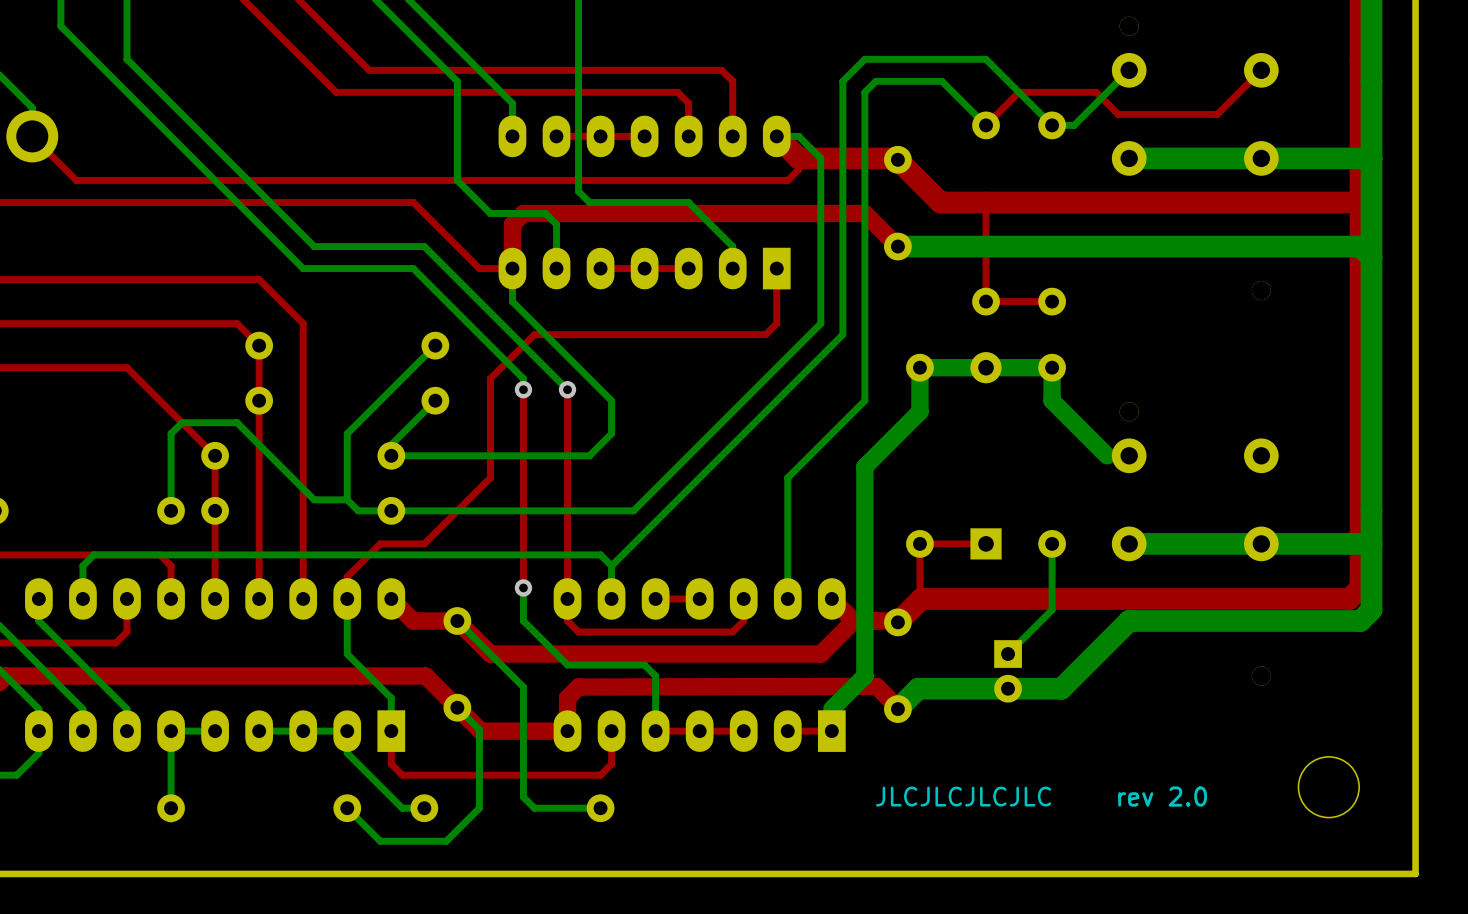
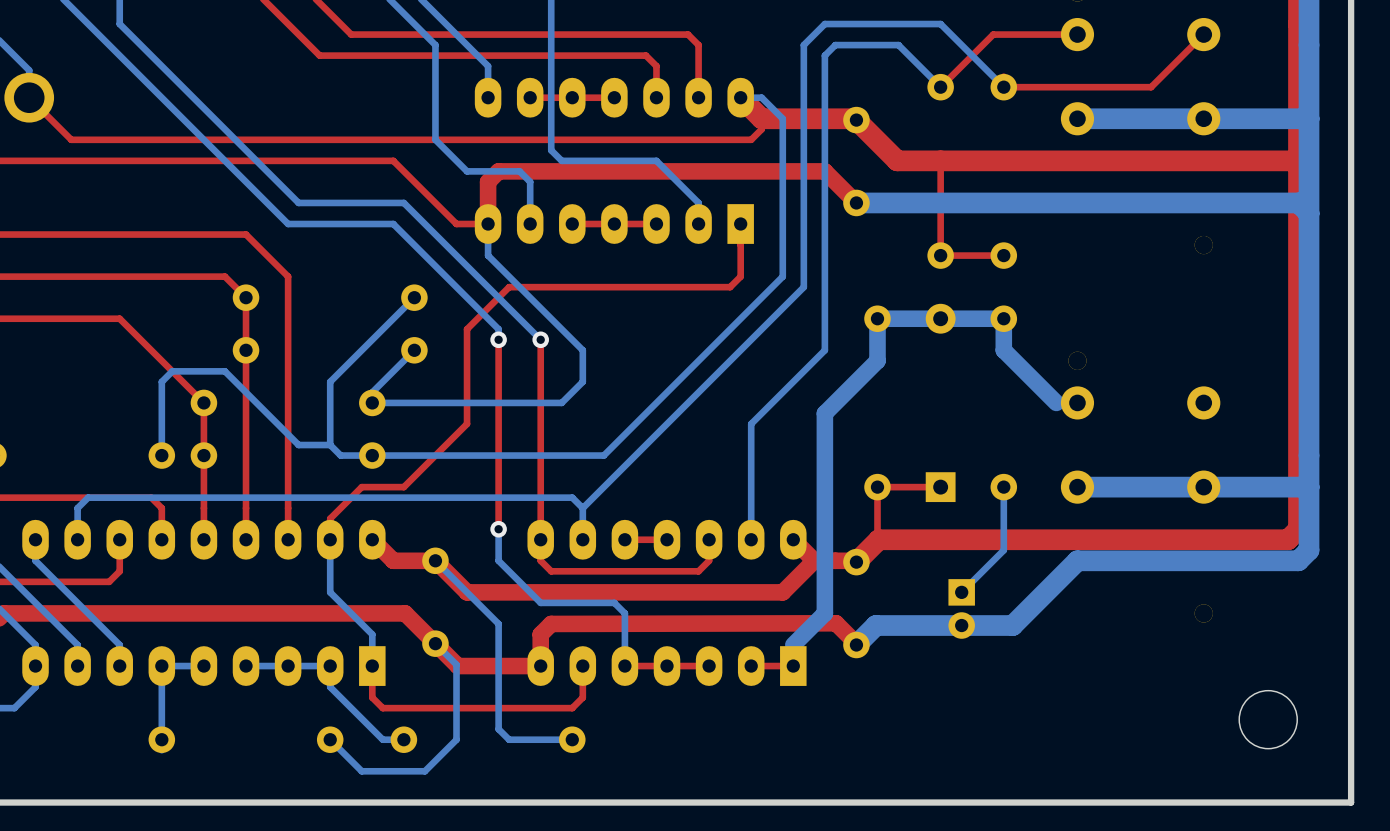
top track: none -> (1077, 34) (993, 34) (972, 55)
bottom track: (1129, 70) (1074, 125) (1052, 125) -> none
top track: (1019, 92) (1096, 92) (1118, 114) (1217, 114) -> (1003, 76) (1003, 87) (1151, 87) (1161, 76)
text: JLCJLCJLCJLC (963, 796) -> none
text: rev 2.0 (1162, 796) -> none

